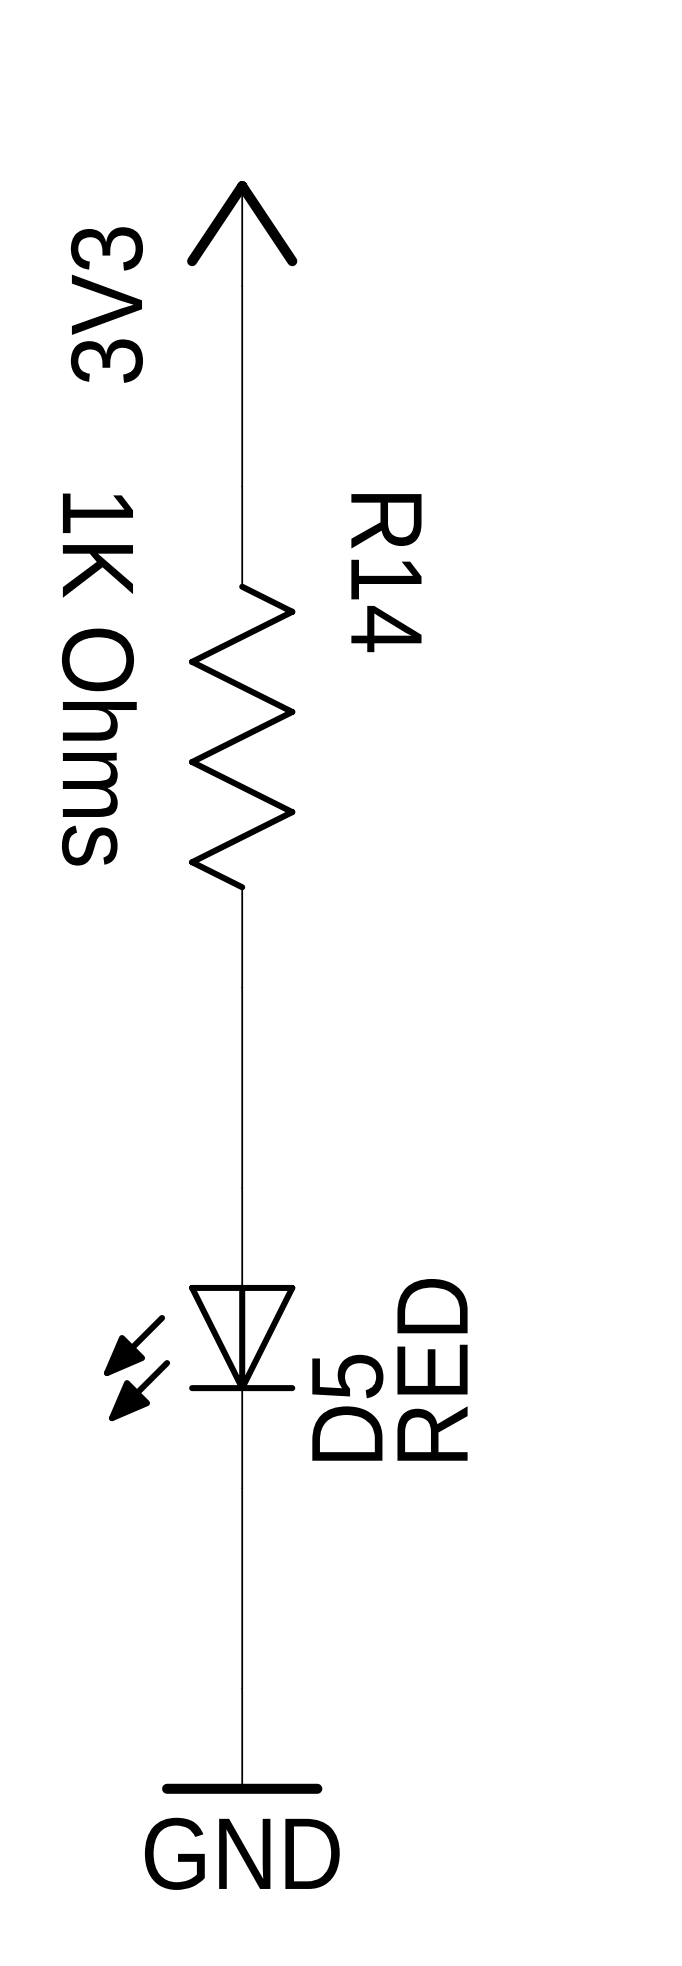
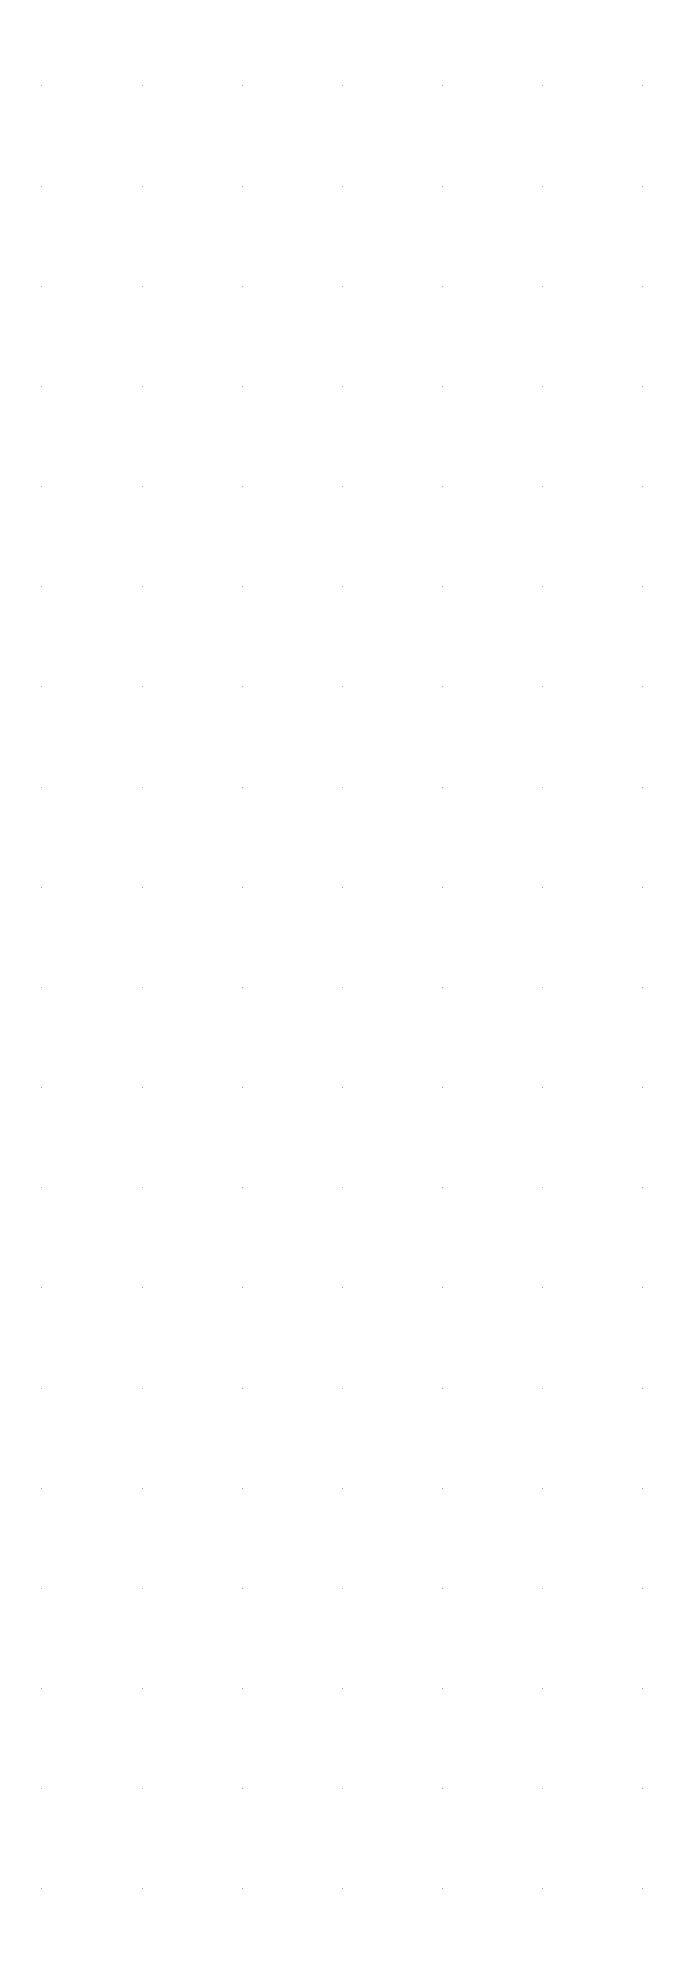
power symbol: 3V3 (242, 233) -> none
wire: (242, 286) (242, 486) -> none
R14: 1K Ohms (242, 736) -> none
wire: (242, 987) (242, 1187) -> none
D5: (199, 1338) -> none
wire: (242, 1488) (242, 1688) -> none
power symbol: GND (242, 1741) -> none

